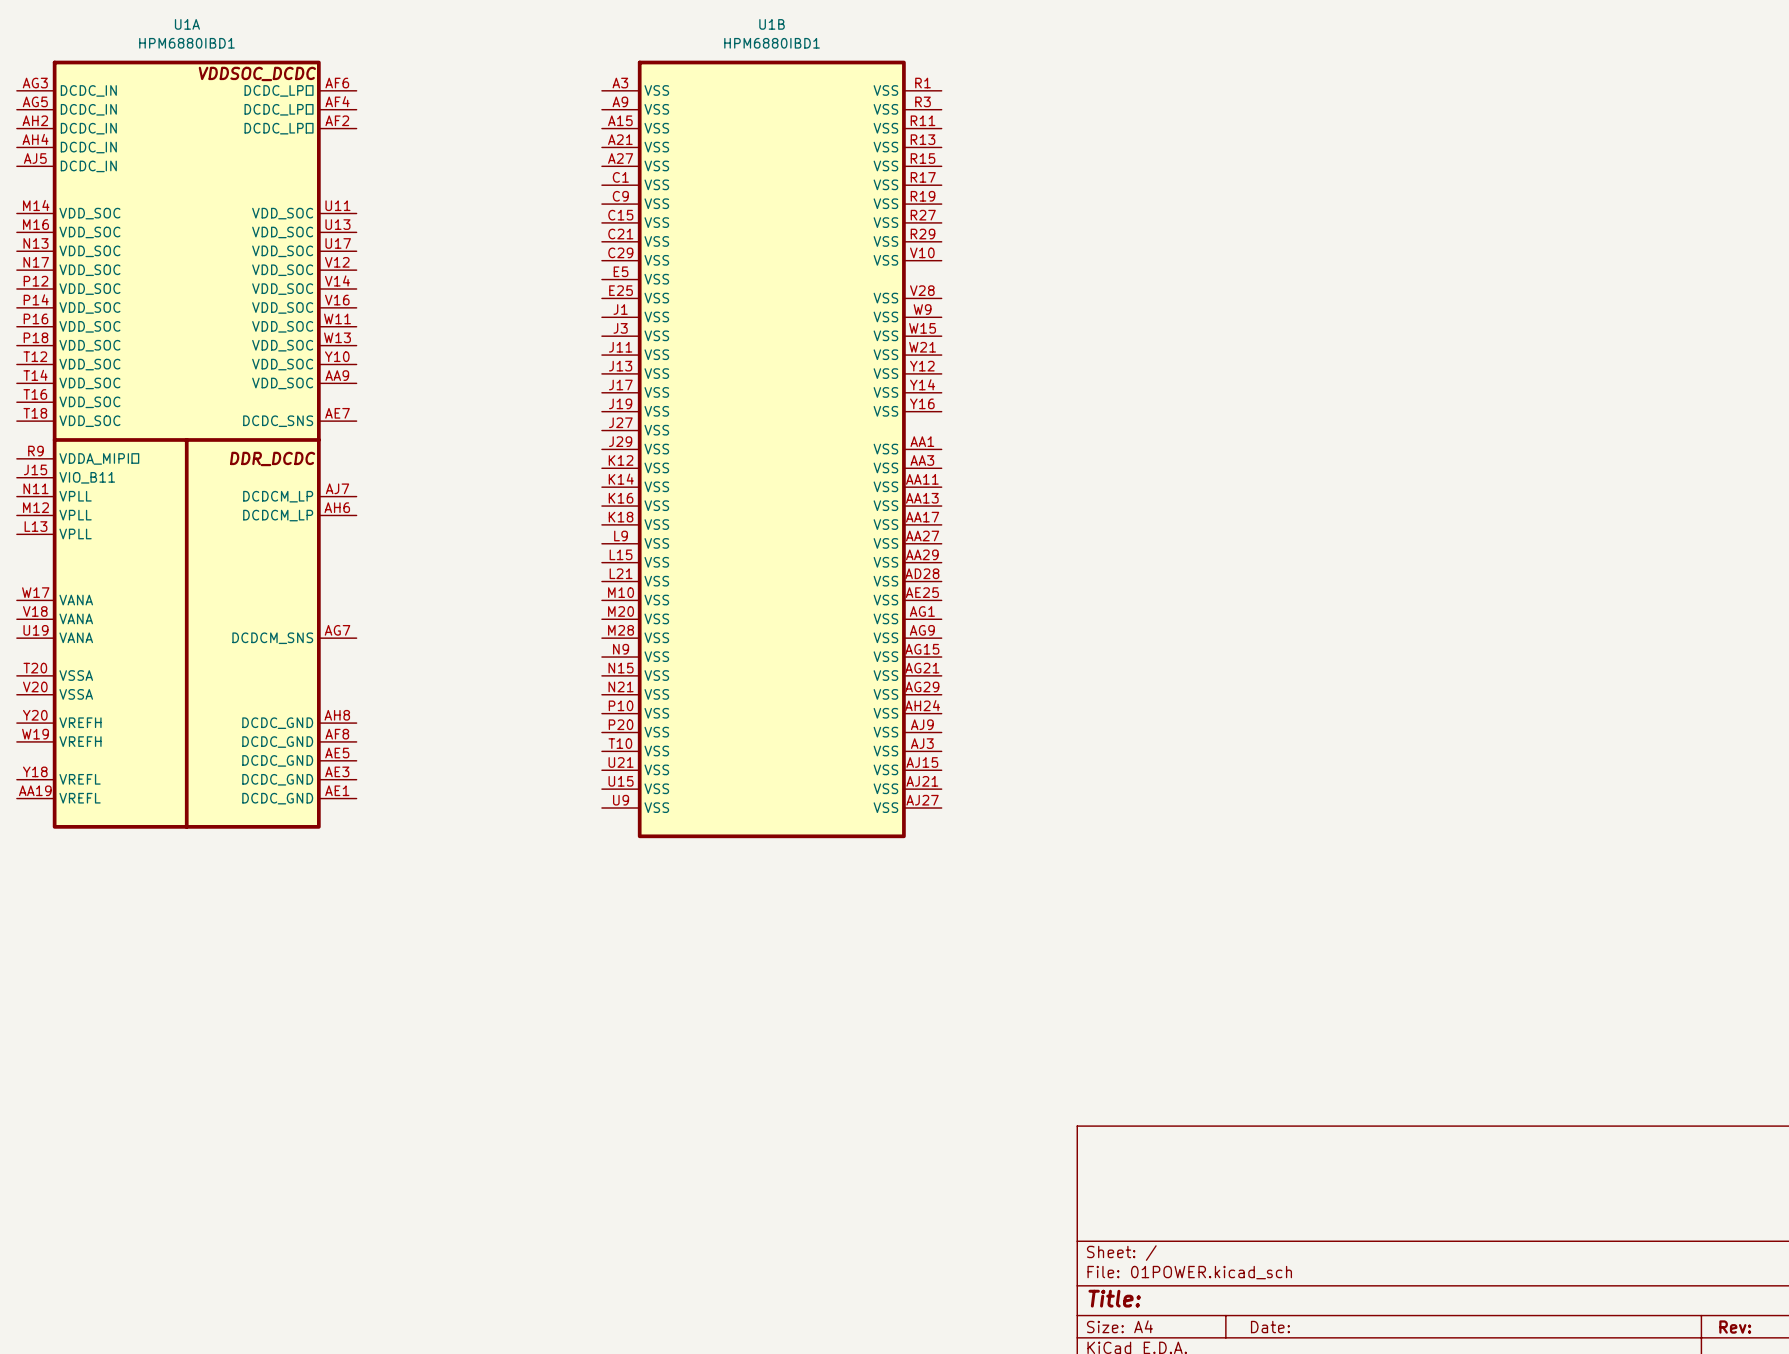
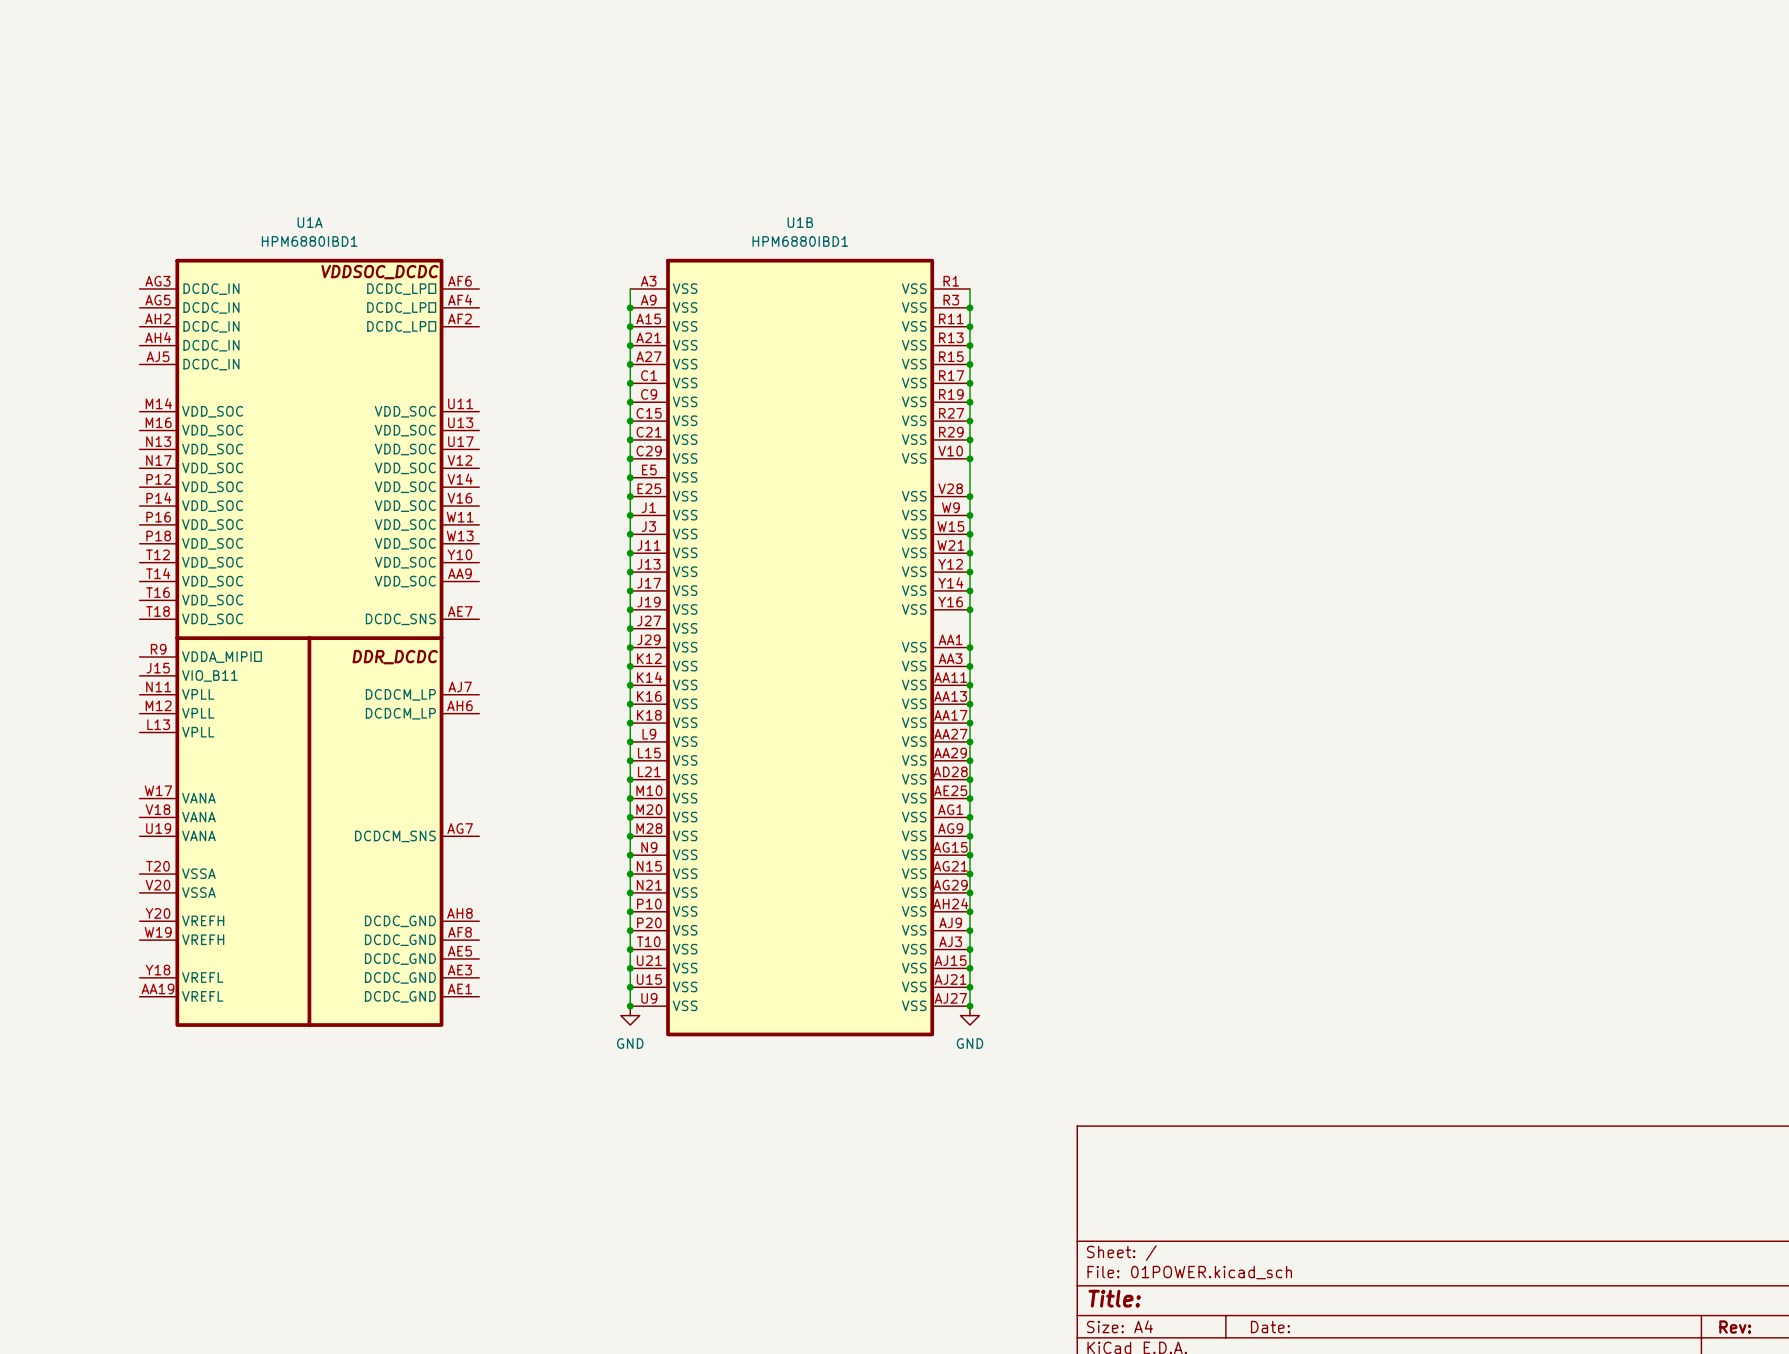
wire: none -> (630, 288) (630, 1006)
wire: none -> (969, 288) (969, 1006)
junction: none -> (630, 307)
junction: none -> (969, 307)
junction: none -> (630, 326)
junction: none -> (969, 326)
junction: none -> (630, 345)
junction: none -> (969, 345)
junction: none -> (630, 364)
junction: none -> (969, 364)
junction: none -> (630, 383)
junction: none -> (969, 383)
junction: none -> (630, 402)
junction: none -> (969, 402)
junction: none -> (630, 421)
junction: none -> (969, 421)
junction: none -> (630, 439)
junction: none -> (969, 439)
U1A position: (186, 444) -> (309, 642)
U1B position: (771, 449) -> (800, 647)
junction: none -> (630, 458)
junction: none -> (969, 458)
junction: none -> (630, 477)
junction: none -> (630, 496)
junction: none -> (969, 496)
junction: none -> (630, 515)
junction: none -> (969, 515)
junction: none -> (630, 534)
junction: none -> (969, 534)
junction: none -> (630, 553)
junction: none -> (969, 553)
junction: none -> (630, 572)
junction: none -> (969, 572)
junction: none -> (630, 590)
junction: none -> (969, 590)
junction: none -> (630, 609)
junction: none -> (969, 609)
junction: none -> (630, 628)
junction: none -> (630, 647)
junction: none -> (969, 647)
junction: none -> (630, 666)
junction: none -> (969, 666)
junction: none -> (630, 685)
junction: none -> (969, 685)
junction: none -> (630, 704)
junction: none -> (969, 704)
junction: none -> (630, 723)
junction: none -> (969, 723)
junction: none -> (630, 741)
junction: none -> (969, 741)
junction: none -> (630, 760)
junction: none -> (969, 760)
junction: none -> (630, 779)
junction: none -> (969, 779)
junction: none -> (630, 798)
junction: none -> (969, 798)
junction: none -> (630, 817)
junction: none -> (969, 817)
junction: none -> (630, 836)
junction: none -> (969, 836)
junction: none -> (630, 855)
junction: none -> (969, 855)
junction: none -> (630, 874)
junction: none -> (969, 874)
junction: none -> (630, 892)
junction: none -> (969, 892)
junction: none -> (630, 911)
junction: none -> (969, 911)
junction: none -> (630, 930)
junction: none -> (969, 930)
junction: none -> (630, 949)
junction: none -> (969, 949)
junction: none -> (630, 968)
junction: none -> (969, 968)
junction: none -> (630, 987)
junction: none -> (969, 987)
junction: none -> (630, 1006)
junction: none -> (969, 1006)
power symbol: none -> GND (630, 1015)
power symbol: none -> GND (969, 1015)

